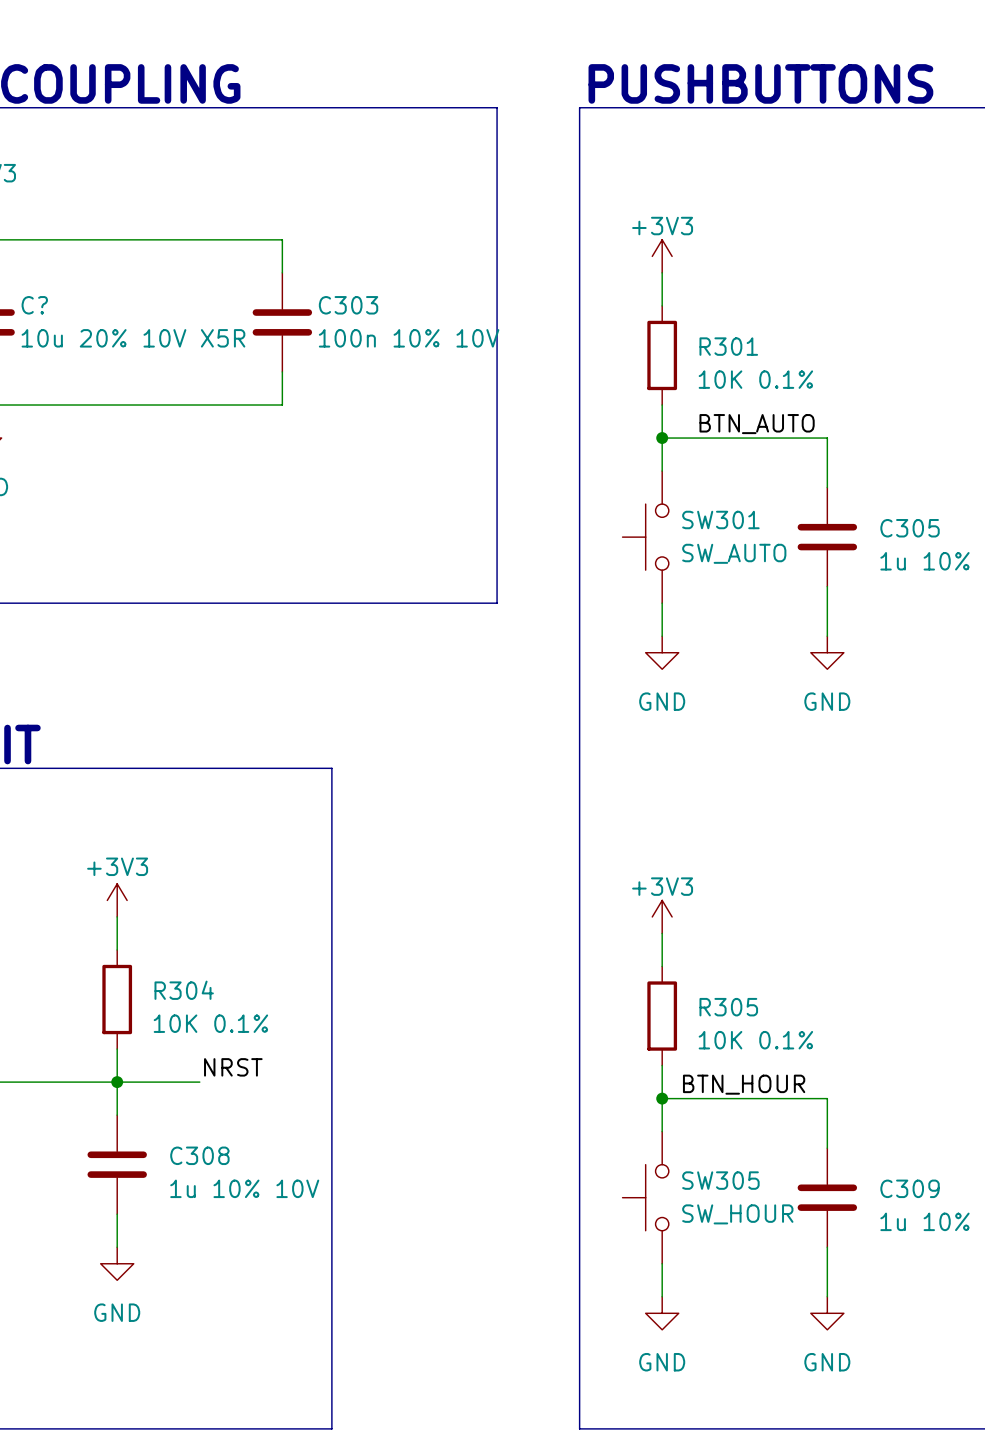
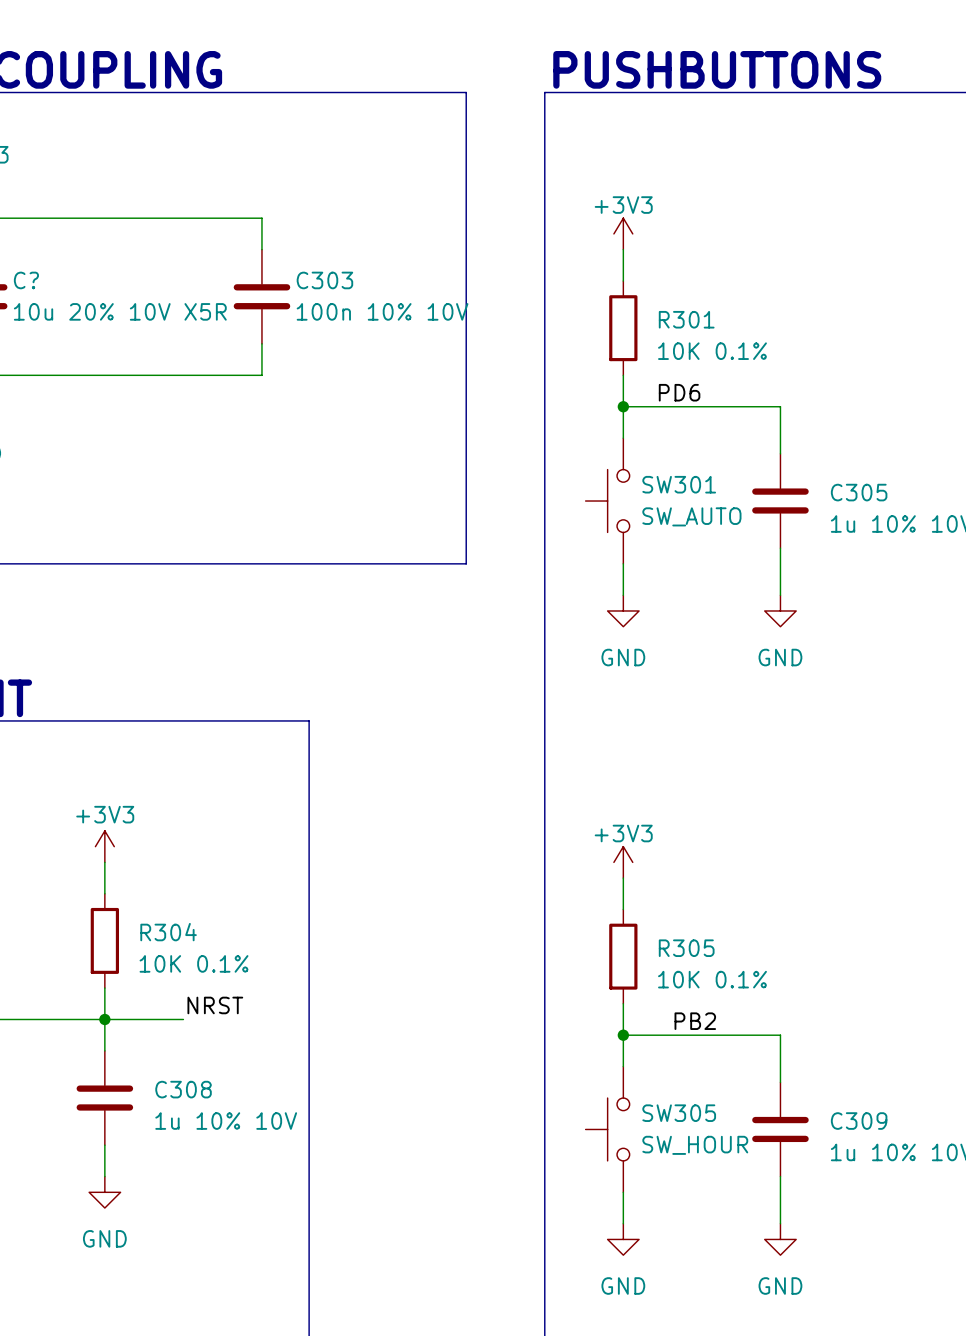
label: BTN_AUTO (757, 424) -> PD6 (679, 392)
label: none -> PB2 (695, 1021)
label: BTN_HOUR (744, 1084) -> none

